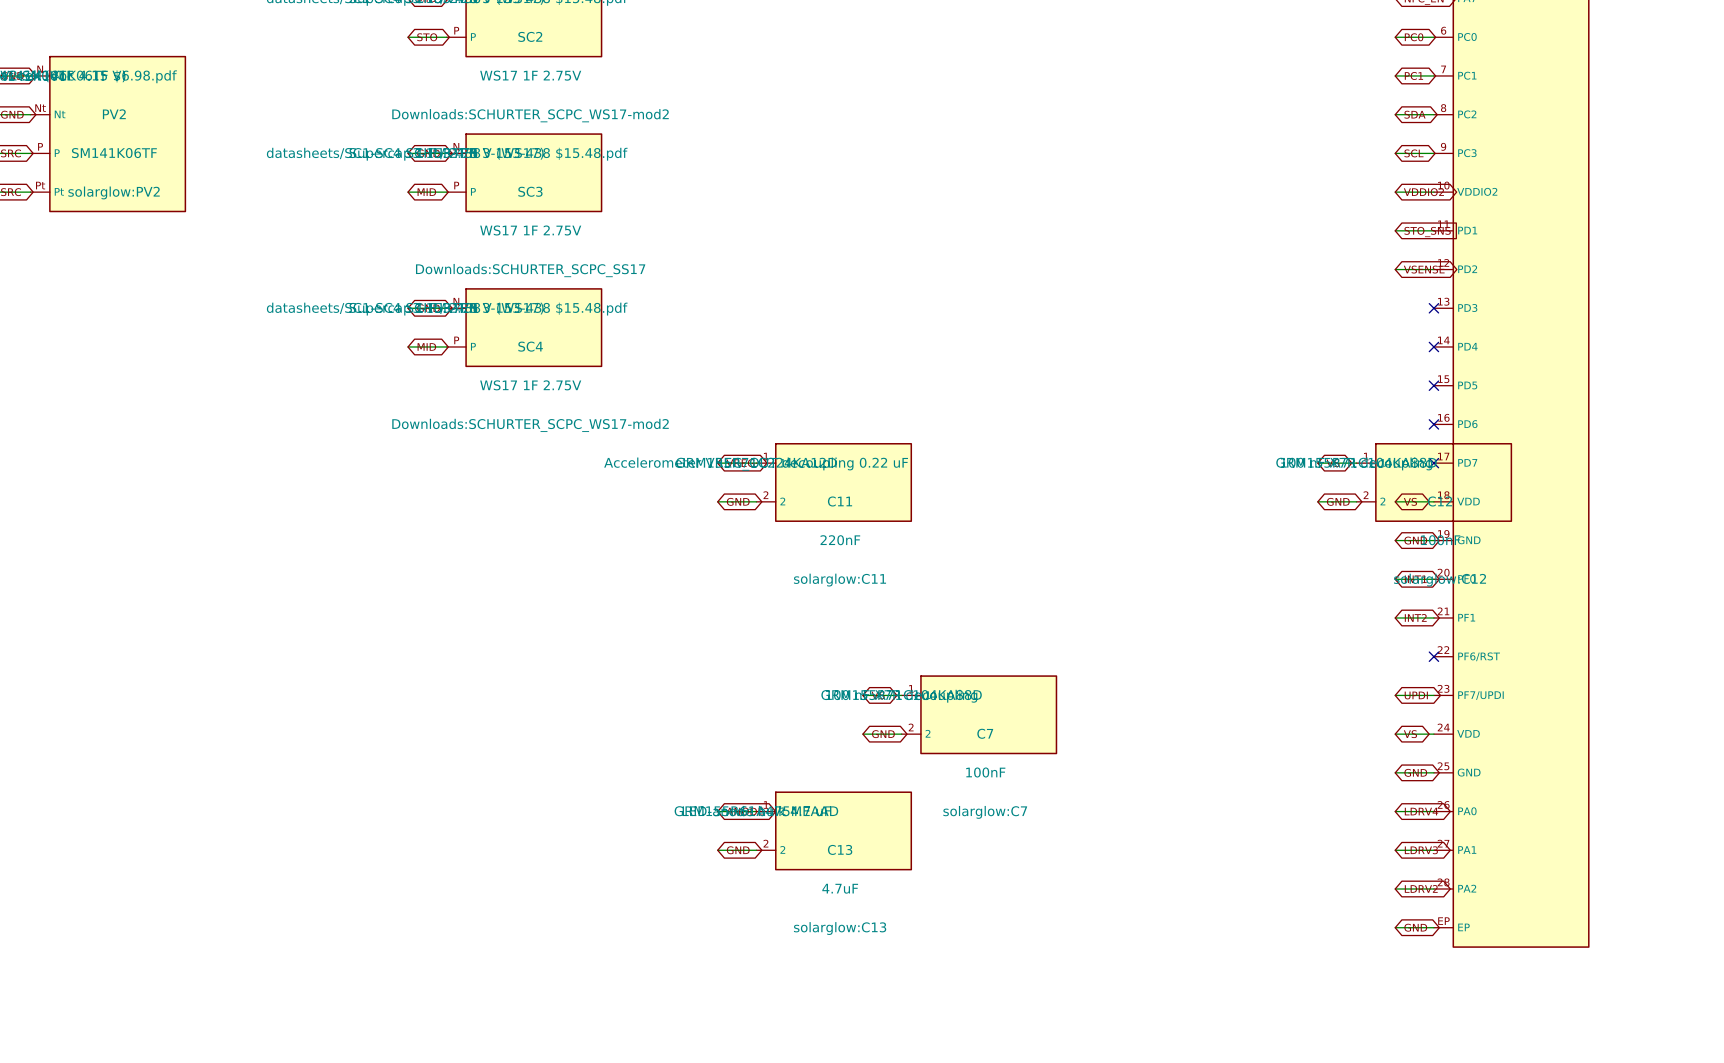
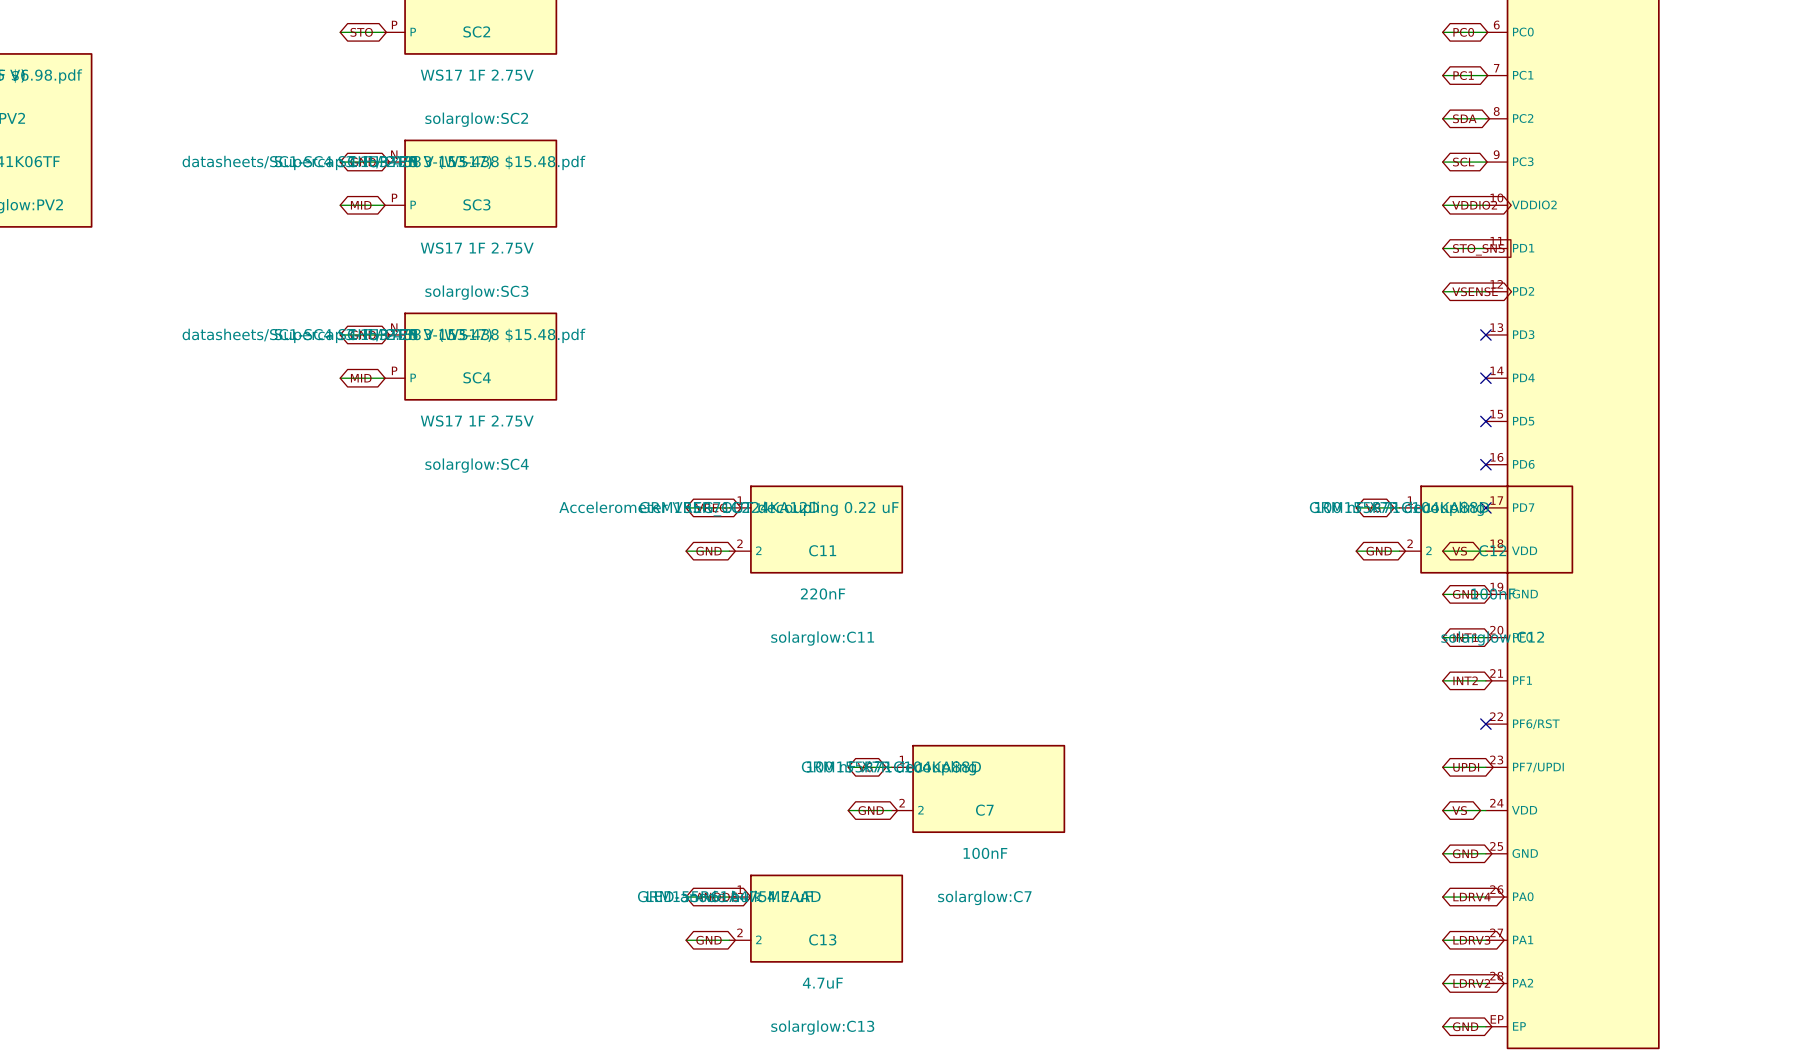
SC2 text: Downloads:SCHURTER_SCPC_WS17-mod2 (530, 115) -> solarglow:SC2 (476, 119)
SC3 text: Downloads:SCHURTER_SCPC_SS17 (530, 270) -> solarglow:SC3 (476, 292)
SC4 text: Downloads:SCHURTER_SCPC_WS17-mod2 (530, 425) -> solarglow:SC4 (477, 465)

